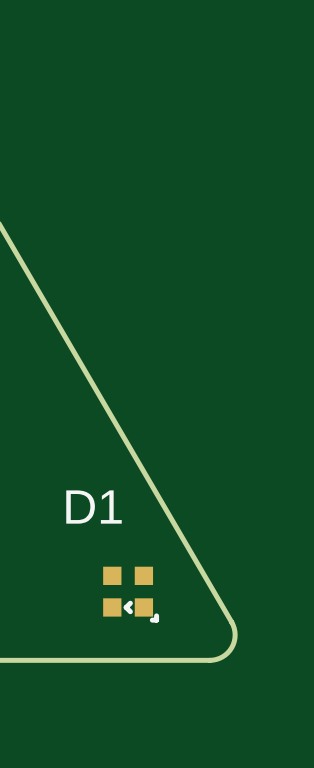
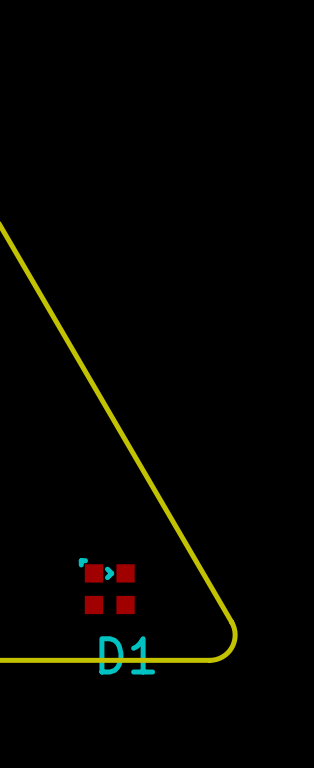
D1 rotation: 0° (131, 594) -> 180° (106, 586)

